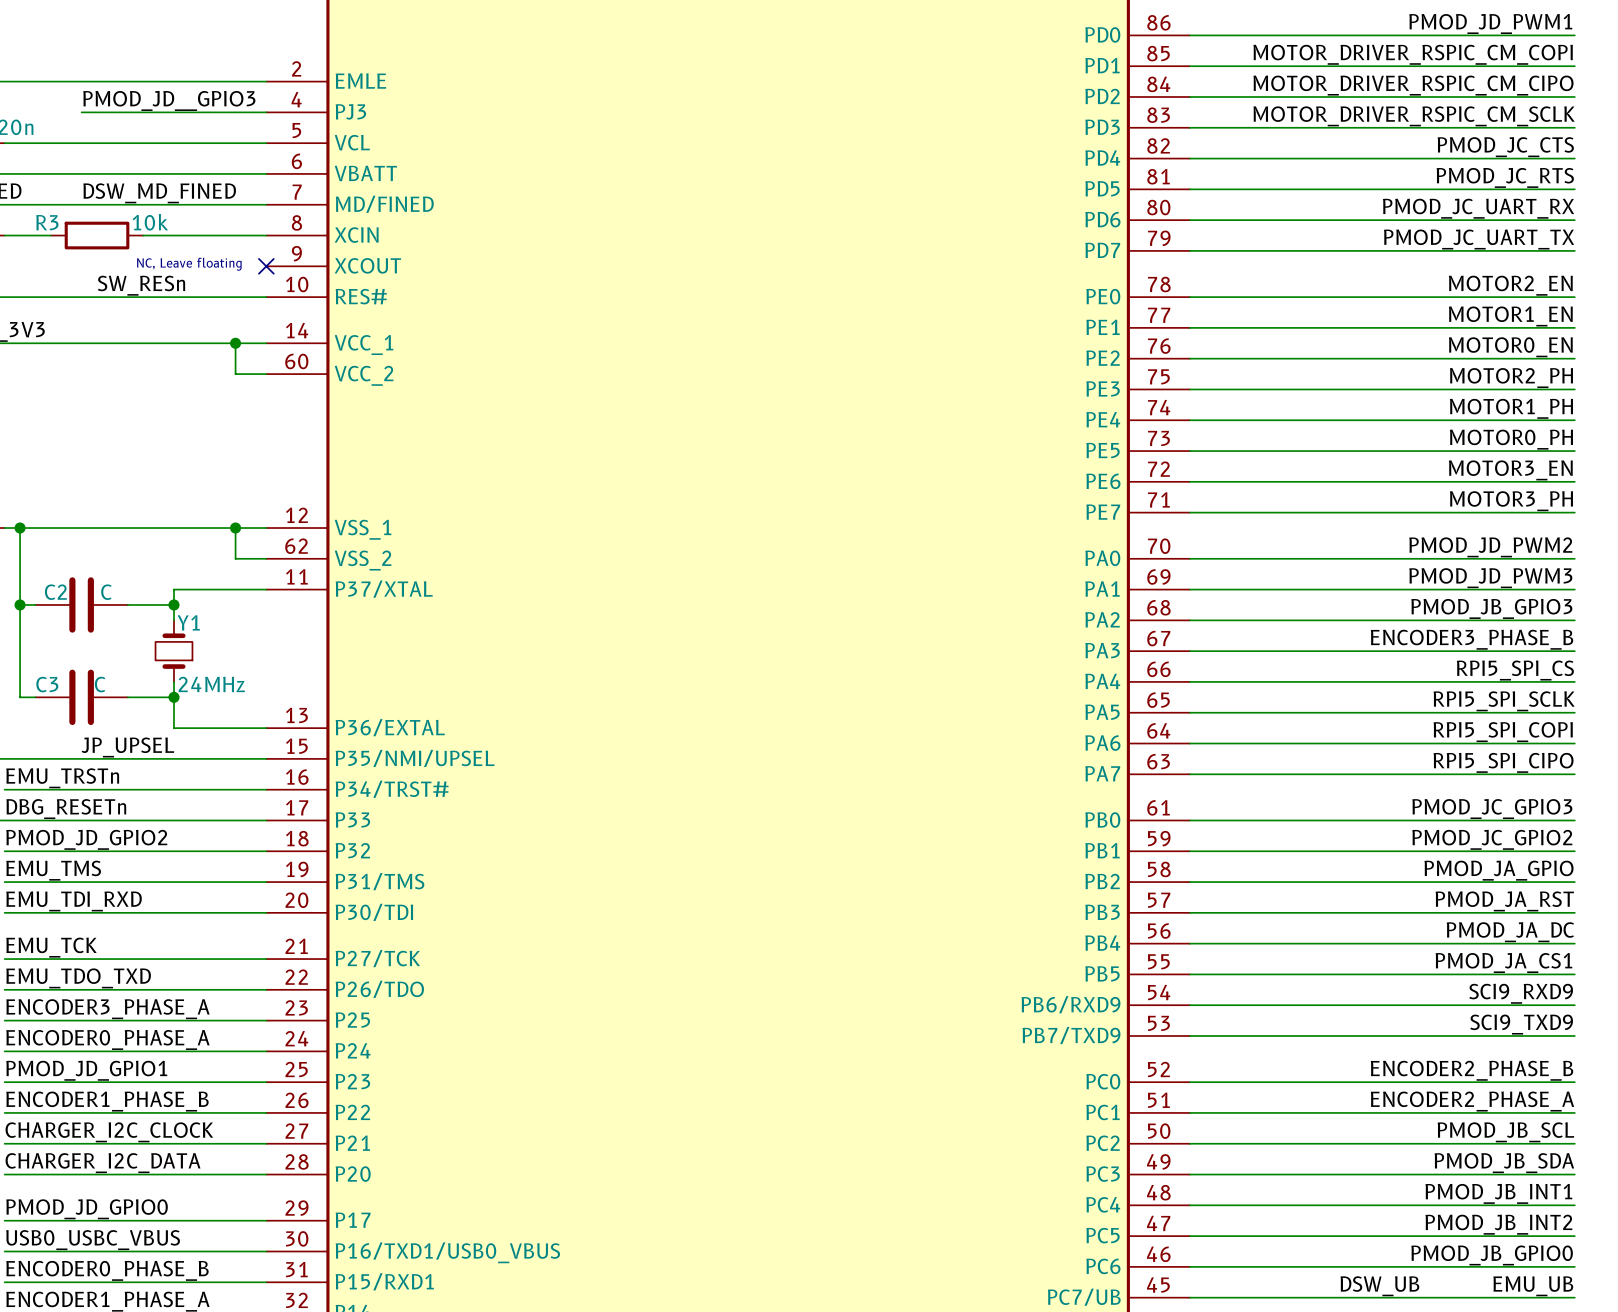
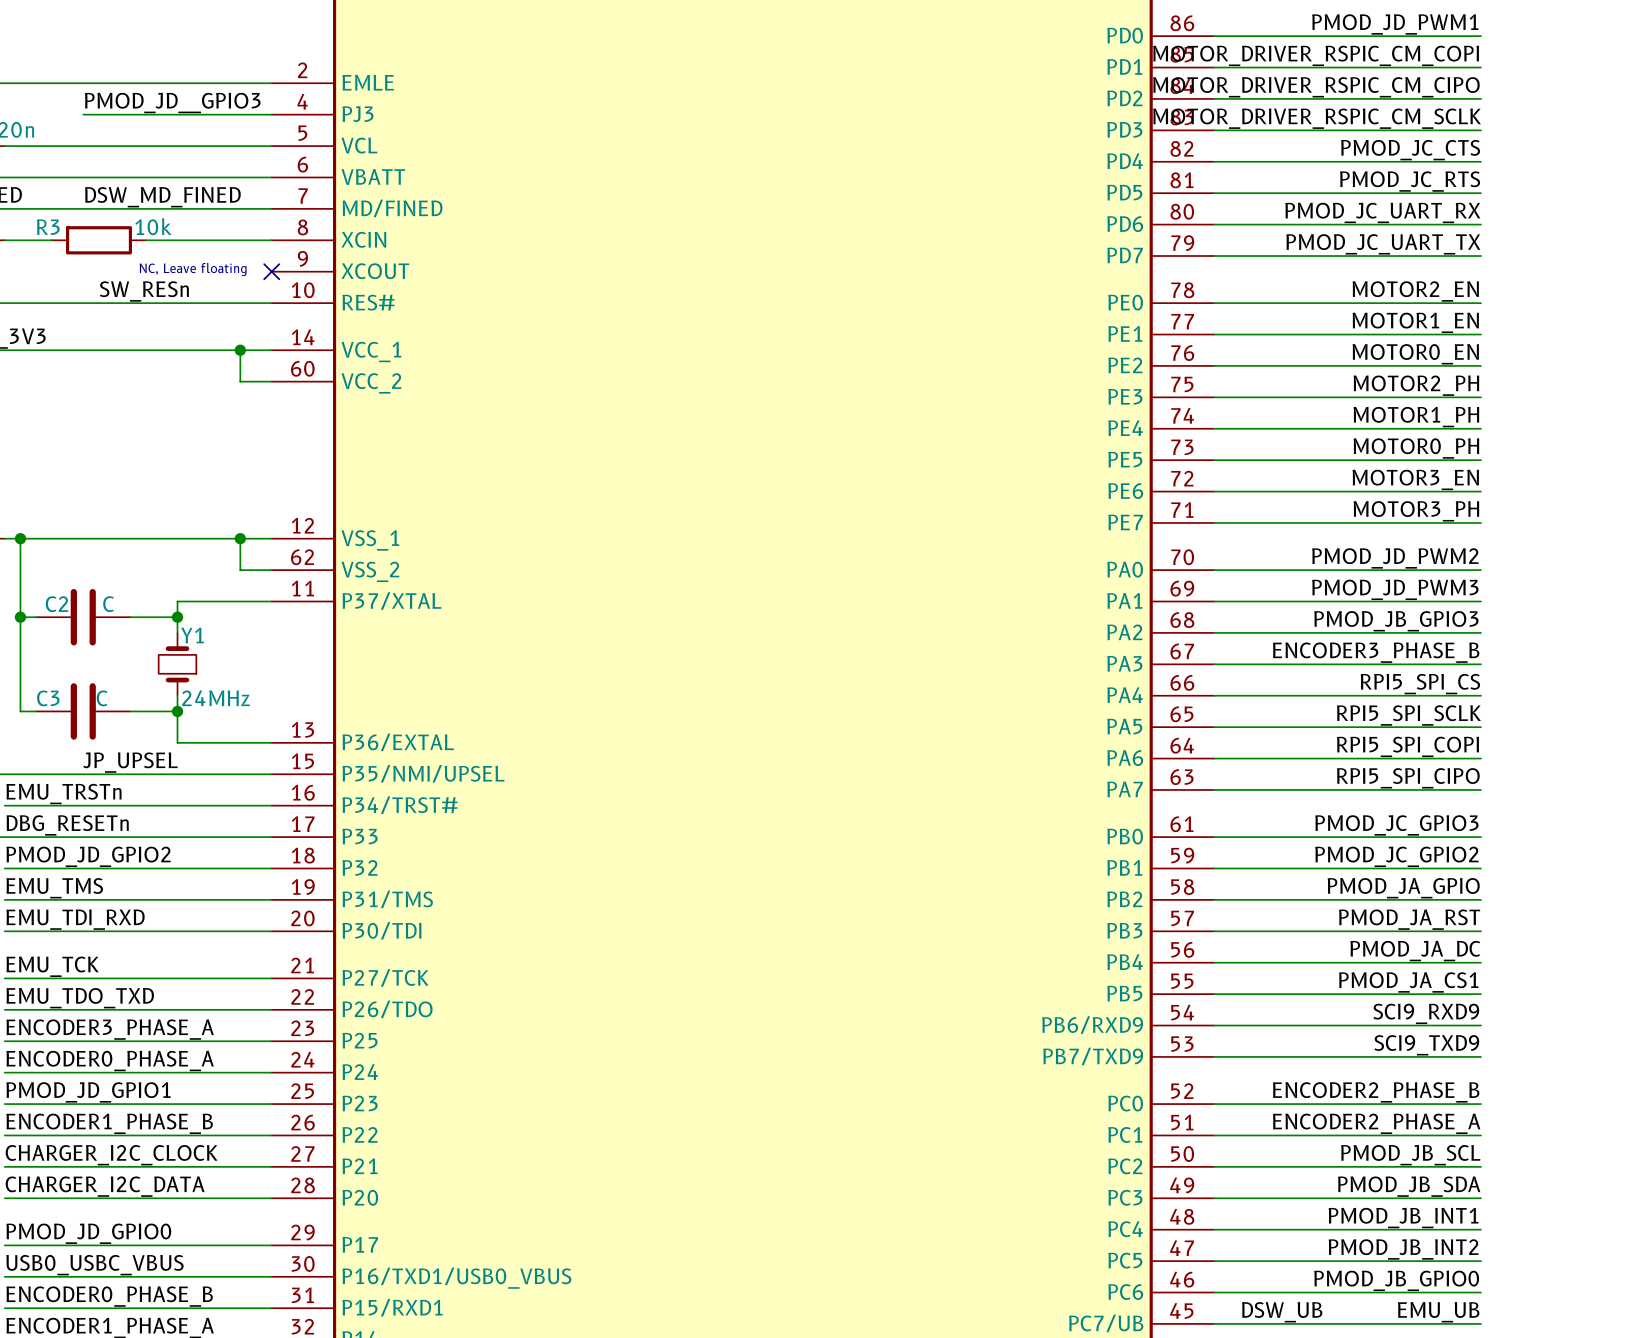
label position: PMOD_JD_PWM1 (1490, 23) -> PMOD_JD_PWM1 (1395, 24)
wire: (1451, 35) (1574, 35) -> none
label position: MOTOR_DRIVER_RSPIC_CM_COPI (1413, 54) -> MOTOR_DRIVER_RSPIC_CM_COPI (1316, 55)
wire: (1451, 66) (1574, 66) -> none
label position: MOTOR_DRIVER_RSPIC_CM_CIPO (1413, 85) -> MOTOR_DRIVER_RSPIC_CM_CIPO (1316, 87)
wire: (1451, 96) (1574, 96) -> none
label position: MOTOR_DRIVER_RSPIC_CM_SCLK (1414, 116) -> MOTOR_DRIVER_RSPIC_CM_SCLK (1317, 118)
wire: (1451, 127) (1574, 127) -> none
label position: PMOD_JC_CTS (1505, 147) -> PMOD_JC_CTS (1410, 150)
wire: (1451, 158) (1574, 158) -> none
label position: PMOD_JC_RTS (1505, 177) -> PMOD_JC_RTS (1410, 181)
wire: (1451, 189) (1574, 189) -> none
label position: PMOD_JC_UART_RX (1478, 208) -> PMOD_JC_UART_RX (1382, 212)
wire: (1451, 220) (1574, 220) -> none
label position: PMOD_JC_UART_TX (1479, 239) -> PMOD_JC_UART_TX (1383, 244)
wire: (1451, 250) (1574, 250) -> none
label position: MOTOR2_EN (1510, 285) -> MOTOR2_EN (1415, 291)
wire: (1451, 297) (1574, 297) -> none
label position: MOTOR1_EN (1510, 316) -> MOTOR1_EN (1415, 322)
wire: (1451, 327) (1574, 327) -> none
label position: MOTOR0_EN (1510, 347) -> MOTOR0_EN (1415, 354)
wire: (1451, 358) (1574, 358) -> none
label position: MOTOR2_PH (1511, 378) -> MOTOR2_PH (1416, 385)
wire: (1451, 389) (1574, 389) -> none
label position: MOTOR1_PH (1511, 408) -> MOTOR1_PH (1416, 417)
wire: (1451, 420) (1574, 420) -> none
label position: MOTOR0_PH (1511, 439) -> MOTOR0_PH (1416, 448)
wire: (1451, 451) (1574, 451) -> none
label position: MOTOR3_EN (1510, 470) -> MOTOR3_EN (1415, 479)
wire: (1451, 481) (1574, 481) -> none
label position: MOTOR3_PH (1511, 501) -> MOTOR3_PH (1416, 511)
wire: (1451, 512) (1574, 512) -> none
label position: PMOD_JD_PWM2 (1490, 547) -> PMOD_JD_PWM2 (1395, 558)
wire: (1451, 558) (1574, 558) -> none
label position: PMOD_JD_PWM3 (1490, 578) -> PMOD_JD_PWM3 (1395, 589)
wire: (1451, 589) (1574, 589) -> none
label position: PMOD_JB_GPIO3 (1491, 608) -> PMOD_JB_GPIO3 (1396, 621)
wire: (1451, 620) (1574, 620) -> none
label position: ENCODER3_PHASE_B (1472, 639) -> ENCODER3_PHASE_B (1376, 652)
wire: (1451, 651) (1574, 651) -> none
label position: RPI5_SPI_CS (1515, 670) -> RPI5_SPI_CS (1420, 684)
wire: (1451, 681) (1574, 681) -> none
label position: RPI5_SPI_SCLK (1504, 701) -> RPI5_SPI_SCLK (1408, 715)
wire: (1451, 712) (1574, 712) -> none
label position: RPI5_SPI_COPI (1503, 732) -> RPI5_SPI_COPI (1407, 746)
wire: (1451, 743) (1574, 743) -> none
label position: RPI5_SPI_CIPO (1503, 762) -> RPI5_SPI_CIPO (1408, 778)
wire: (1451, 774) (1574, 774) -> none
label position: PMOD_JC_GPIO3 (1492, 809) -> PMOD_JC_GPIO3 (1396, 825)
wire: (1451, 820) (1574, 820) -> none
label position: PMOD_JC_GPIO2 (1492, 839) -> PMOD_JC_GPIO2 (1396, 856)
wire: (1451, 851) (1574, 851) -> none
label position: PMOD_JA_GPIO (1498, 870) -> PMOD_JA_GPIO (1403, 888)
wire: (1451, 882) (1574, 882) -> none
label position: PMOD_JA_RST (1504, 901) -> PMOD_JA_RST (1409, 919)
wire: (1451, 912) (1574, 912) -> none
label position: PMOD_JA_DC (1510, 932) -> PMOD_JA_DC (1415, 951)
wire: (1451, 943) (1574, 943) -> none
label position: PMOD_JA_CS1 (1503, 962) -> PMOD_JA_CS1 (1408, 982)
wire: (1451, 974) (1574, 974) -> none
label position: SCI9_RXD9 (1521, 993) -> SCI9_RXD9 (1426, 1013)
wire: (1451, 1005) (1574, 1005) -> none
label position: SCI9_TXD9 (1521, 1024) -> SCI9_TXD9 (1426, 1045)
wire: (1451, 1035) (1574, 1035) -> none
label position: ENCODER2_PHASE_B (1472, 1070) -> ENCODER2_PHASE_B (1376, 1092)
wire: (1451, 1082) (1574, 1082) -> none
label position: ENCODER2_PHASE_A (1472, 1101) -> ENCODER2_PHASE_A (1376, 1123)
wire: (1451, 1112) (1574, 1112) -> none
label position: PMOD_JB_SCL (1505, 1132) -> PMOD_JB_SCL (1410, 1155)
wire: (1451, 1143) (1574, 1143) -> none
label position: PMOD_JB_SDA (1504, 1163) -> PMOD_JB_SDA (1409, 1186)
wire: (1451, 1174) (1574, 1174) -> none
label position: PMOD_JB_INT1 (1498, 1193) -> PMOD_JB_INT1 (1403, 1218)
wire: (1451, 1205) (1574, 1205) -> none
label position: PMOD_JB_INT2 (1498, 1224) -> PMOD_JB_INT2 (1403, 1249)
wire: (1451, 1236) (1574, 1236) -> none
label position: PMOD_JB_GPIO0 (1492, 1255) -> PMOD_JB_GPIO0 (1396, 1280)
wire: (1451, 1266) (1574, 1266) -> none
label position: DSW_UB (1379, 1286) -> DSW_UB (1282, 1312)
label position: EMU_UB (1533, 1286) -> EMU_UB (1438, 1312)
wire: (1451, 1297) (1574, 1297) -> none

